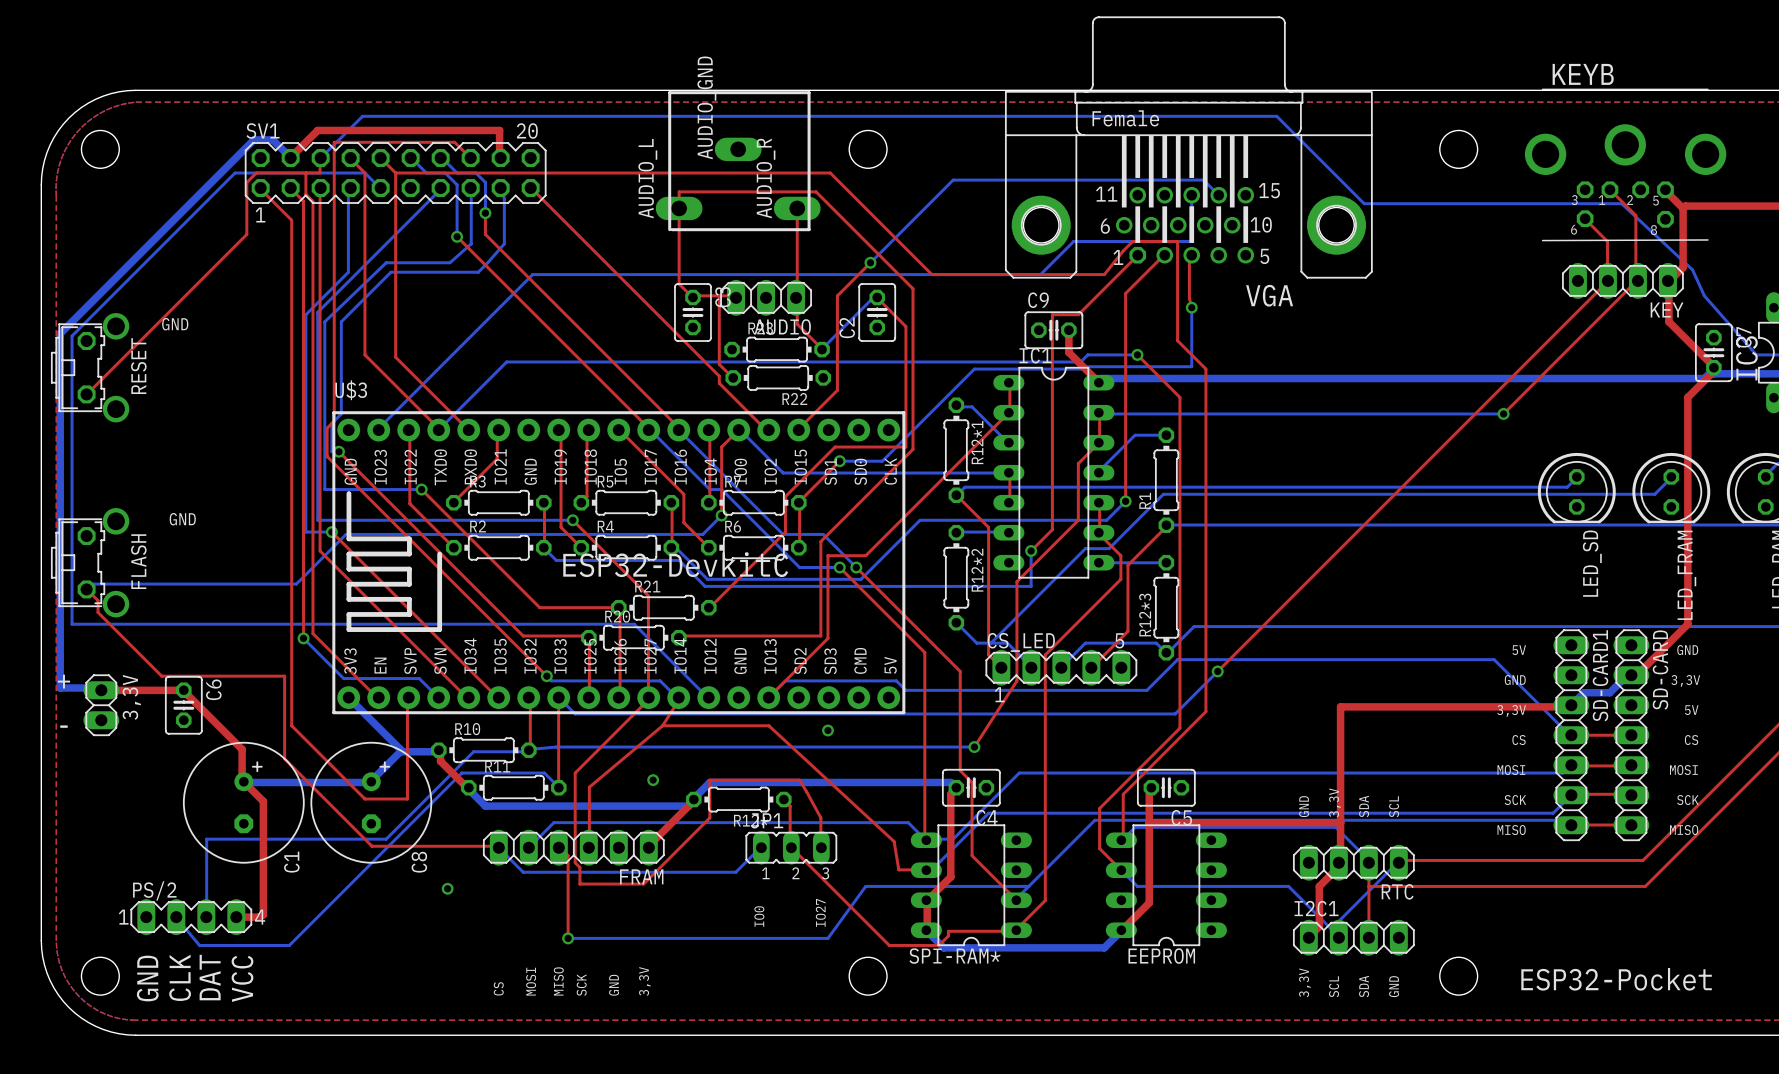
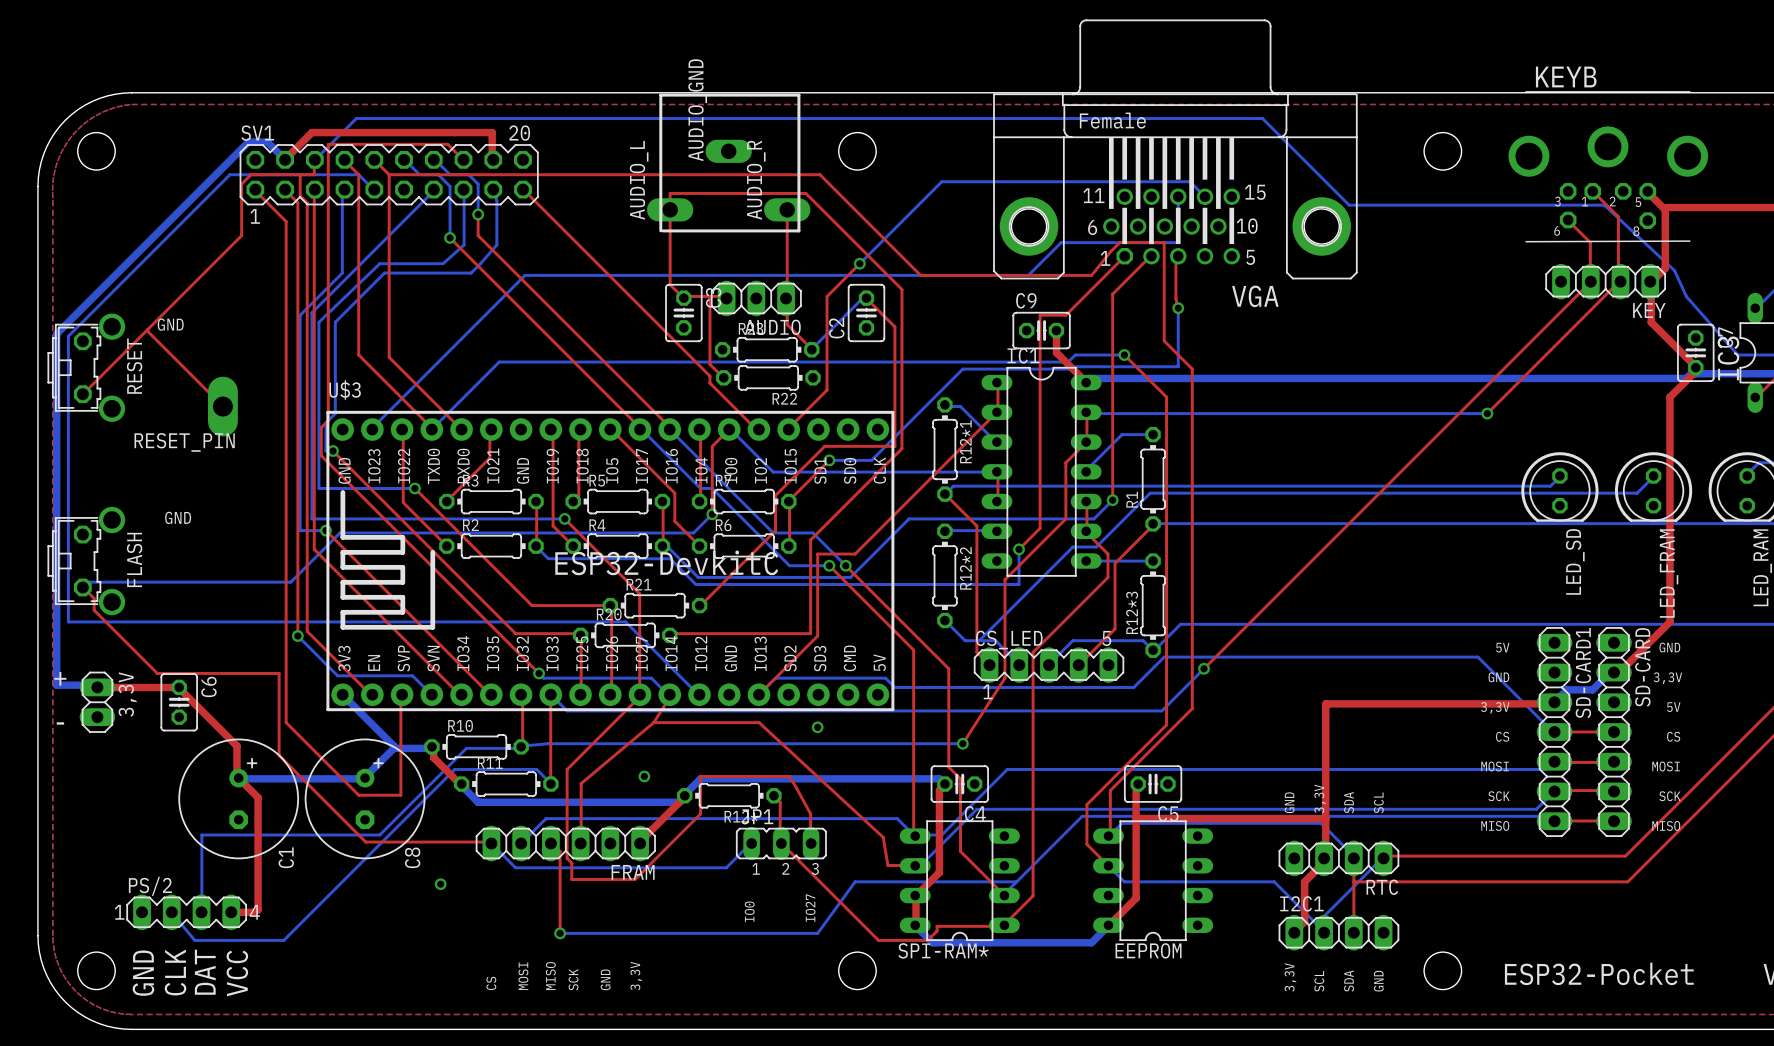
top track: none -> (148, 329) (148, 331) (222, 406)
RESET_PIN: none -> (222, 406)

